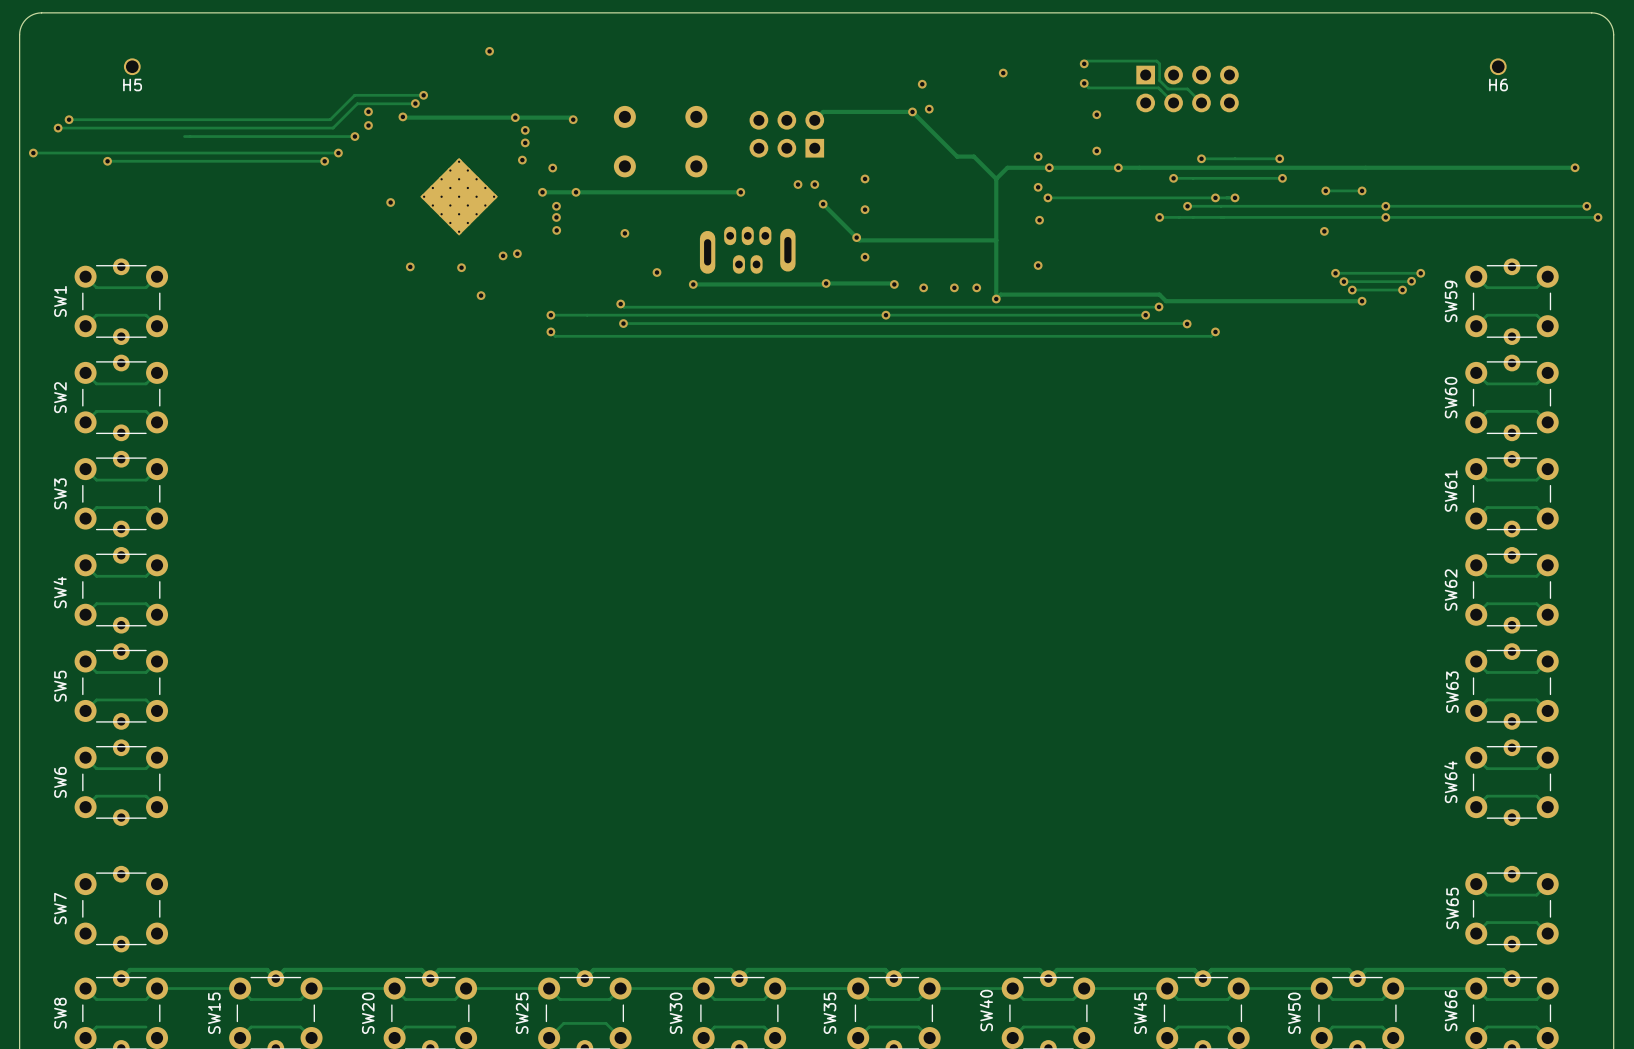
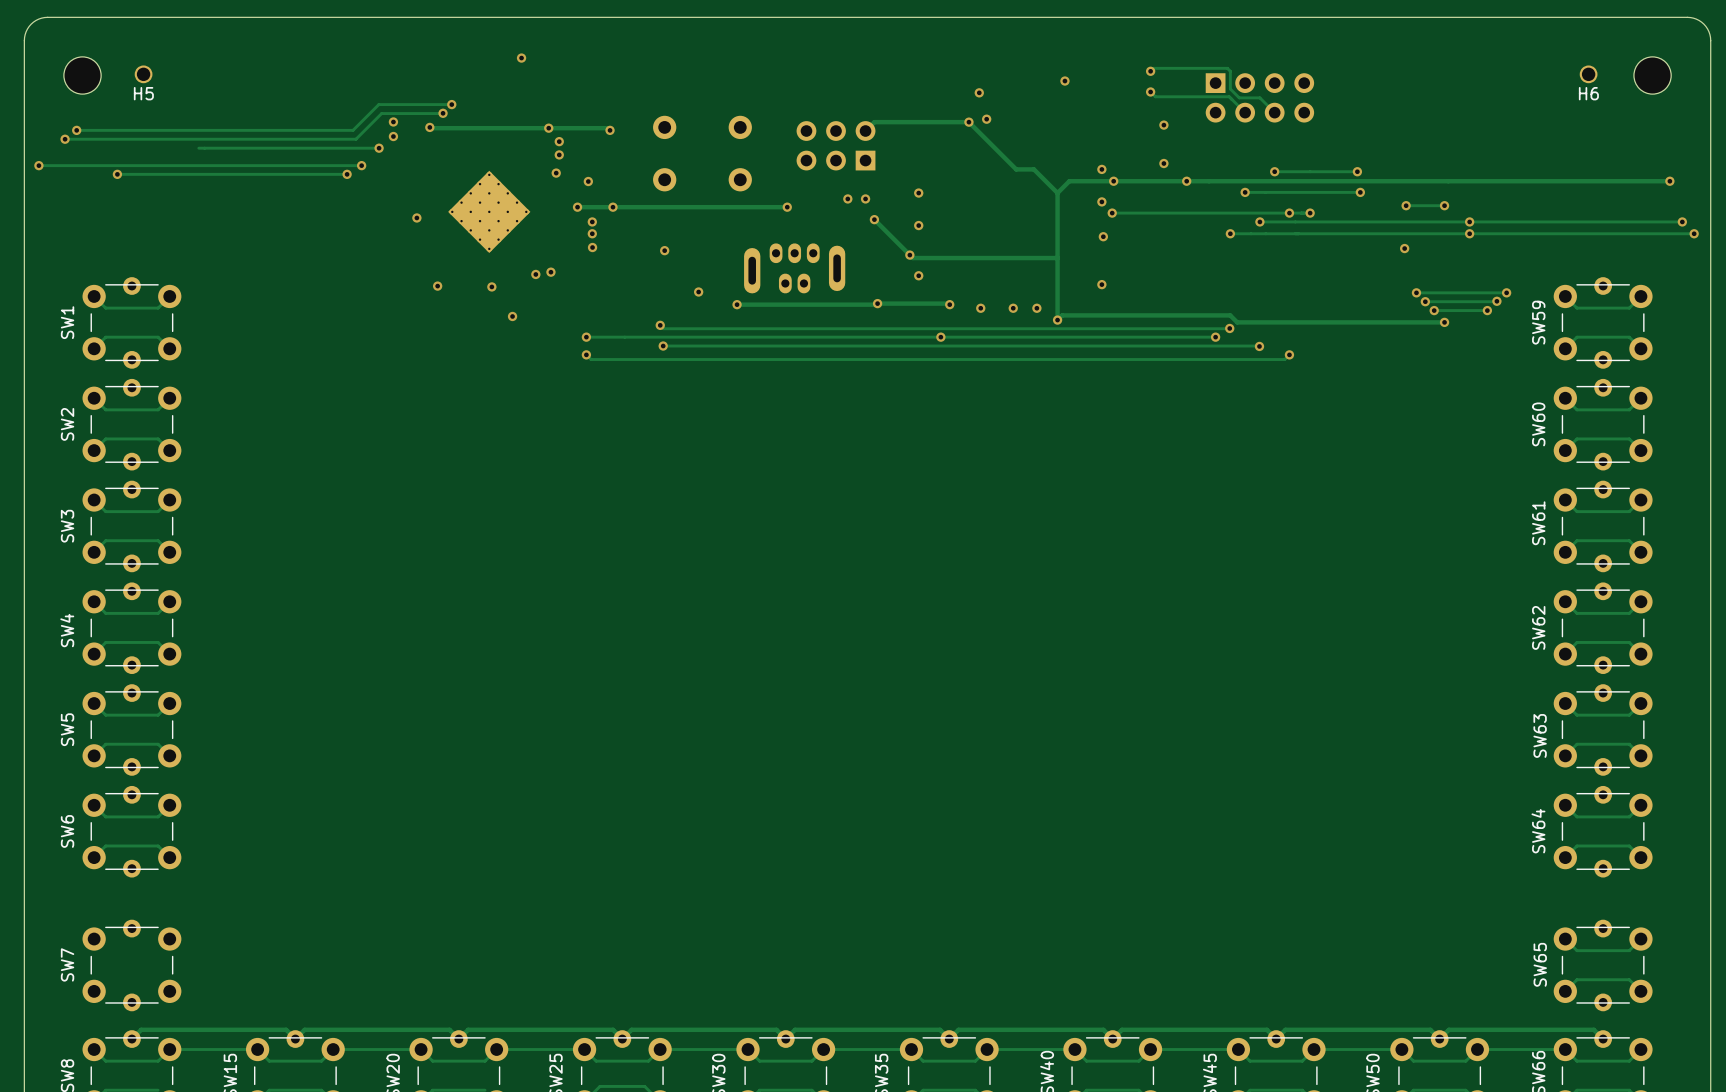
part: none -> (82, 75)
part: none -> (1652, 75)

